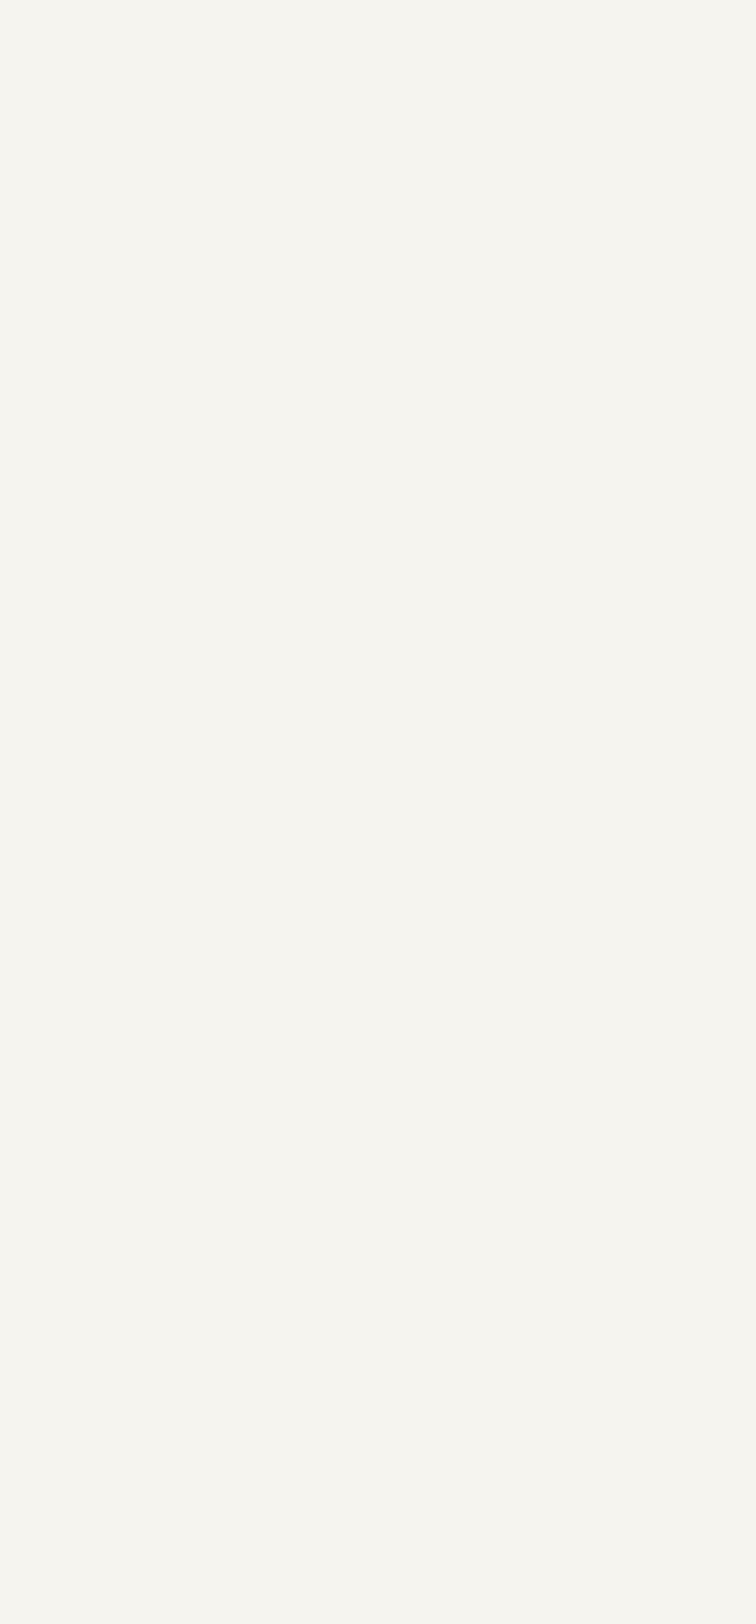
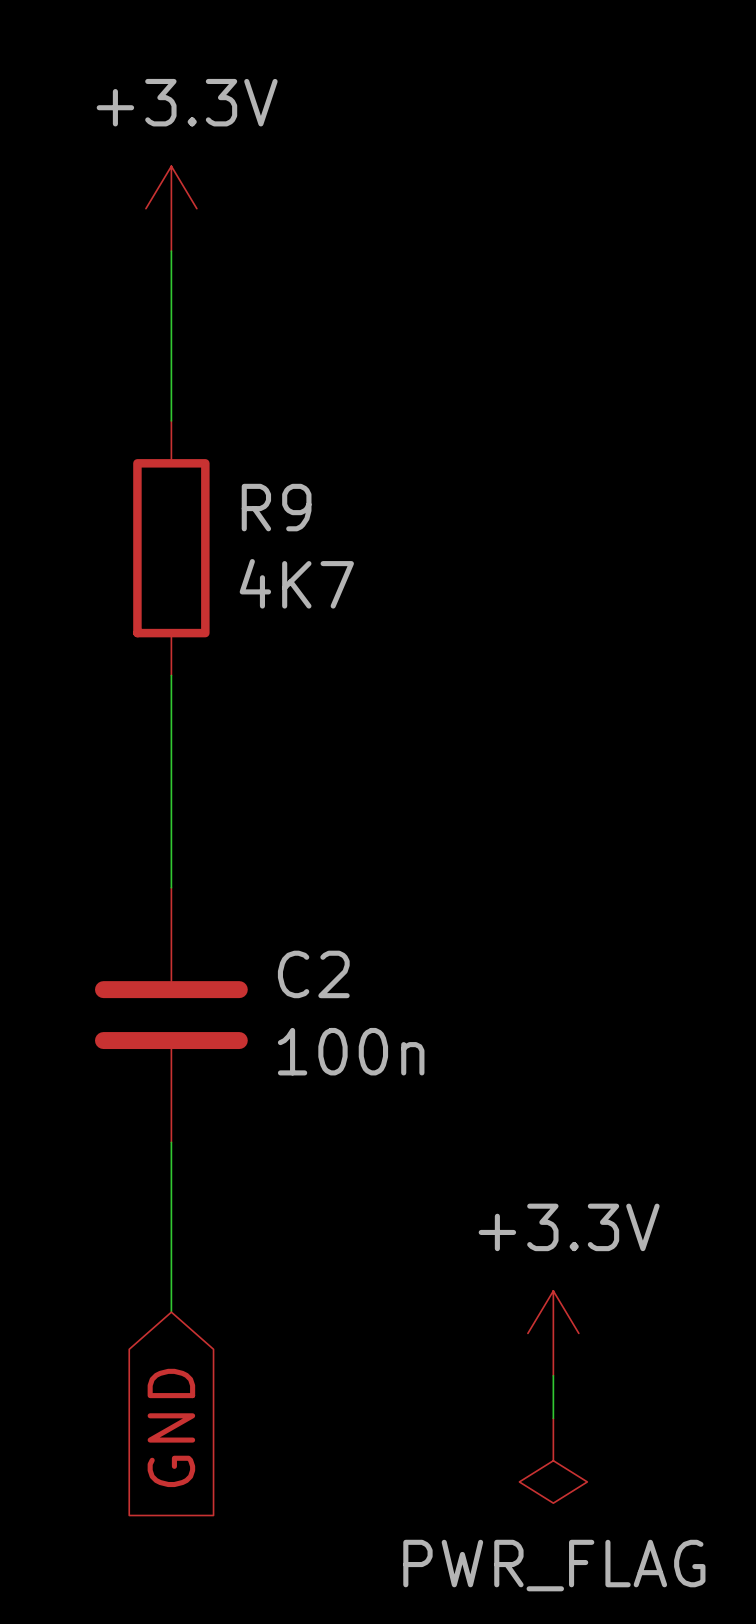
power symbol: none -> +3.3V (171, 208)
wire: none -> (171, 251) (171, 420)
R9: none -> 4K7 (171, 548)
wire: none -> (171, 675) (171, 887)
C2: none -> 100n (171, 1015)
wire: none -> (171, 1142) (171, 1312)
power symbol: none -> +3.3V (553, 1333)
wire: none -> (553, 1375) (553, 1418)
global label: none -> GND (171, 1427)
power symbol: none -> PWR_FLAG (553, 1460)

